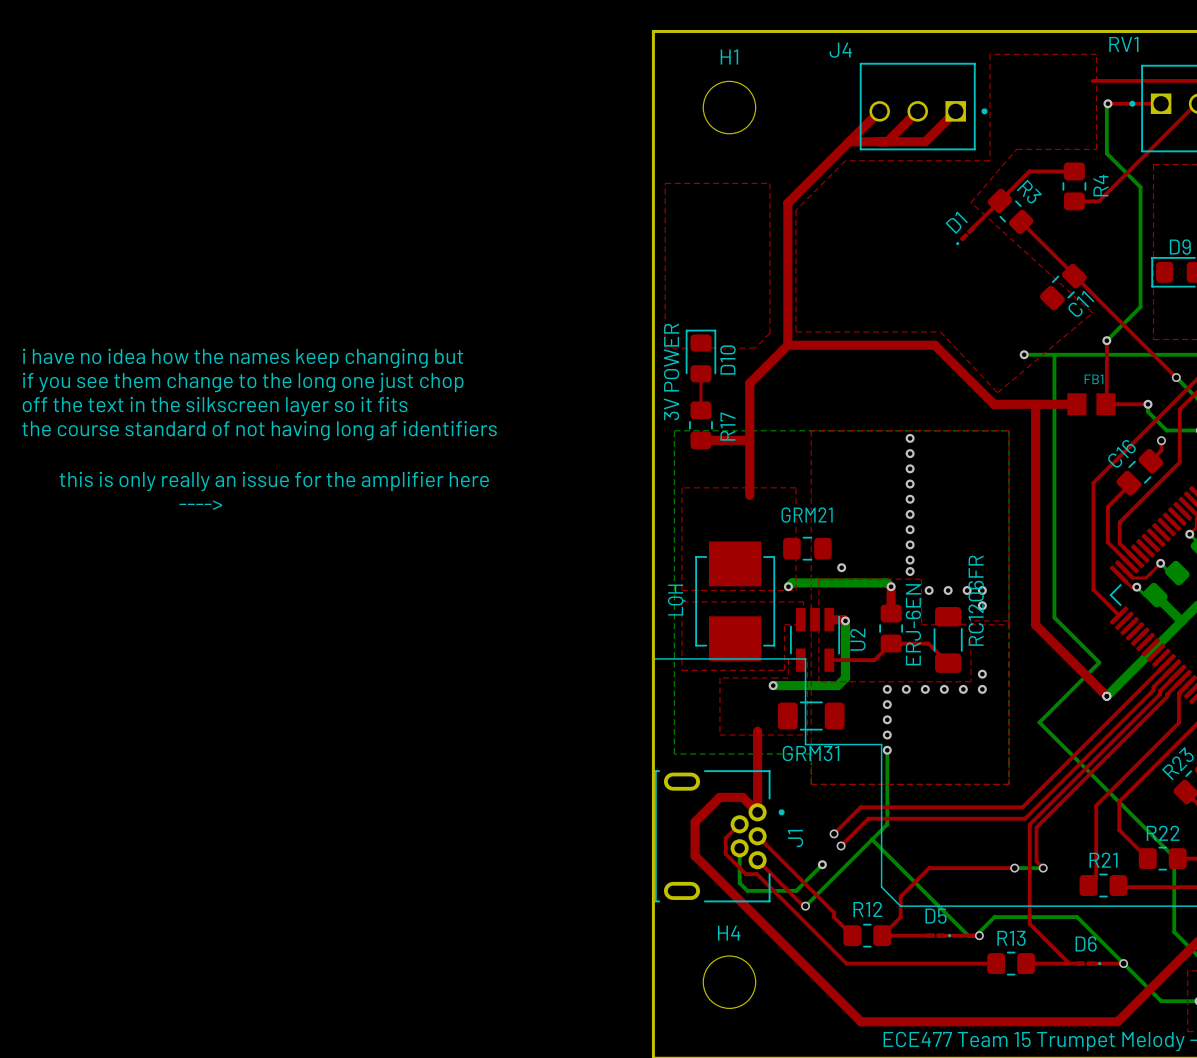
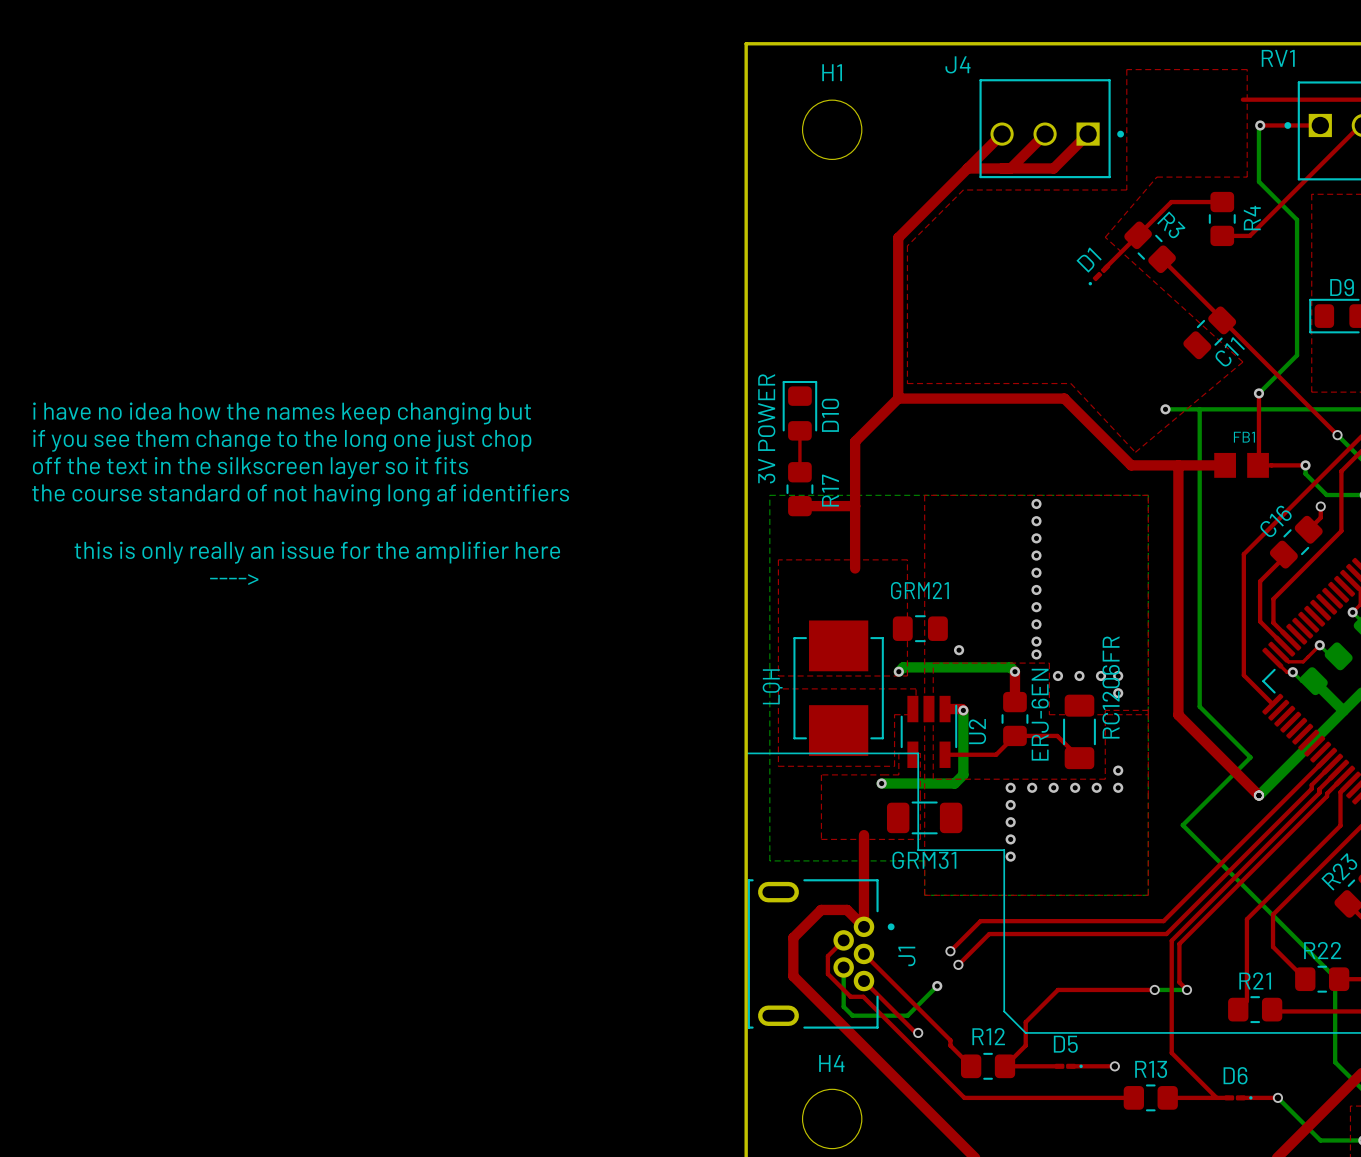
top zone outline: (665, 183) (769, 183) (769, 333) (755, 348) (665, 348) (665, 183) -> none
bottom track: (887, 750) (887, 824) (805, 906) -> none
bottom track: (872, 839) (968, 935) (979, 935) (979, 932) (994, 917) (1077, 917) (1123, 963) -> none

